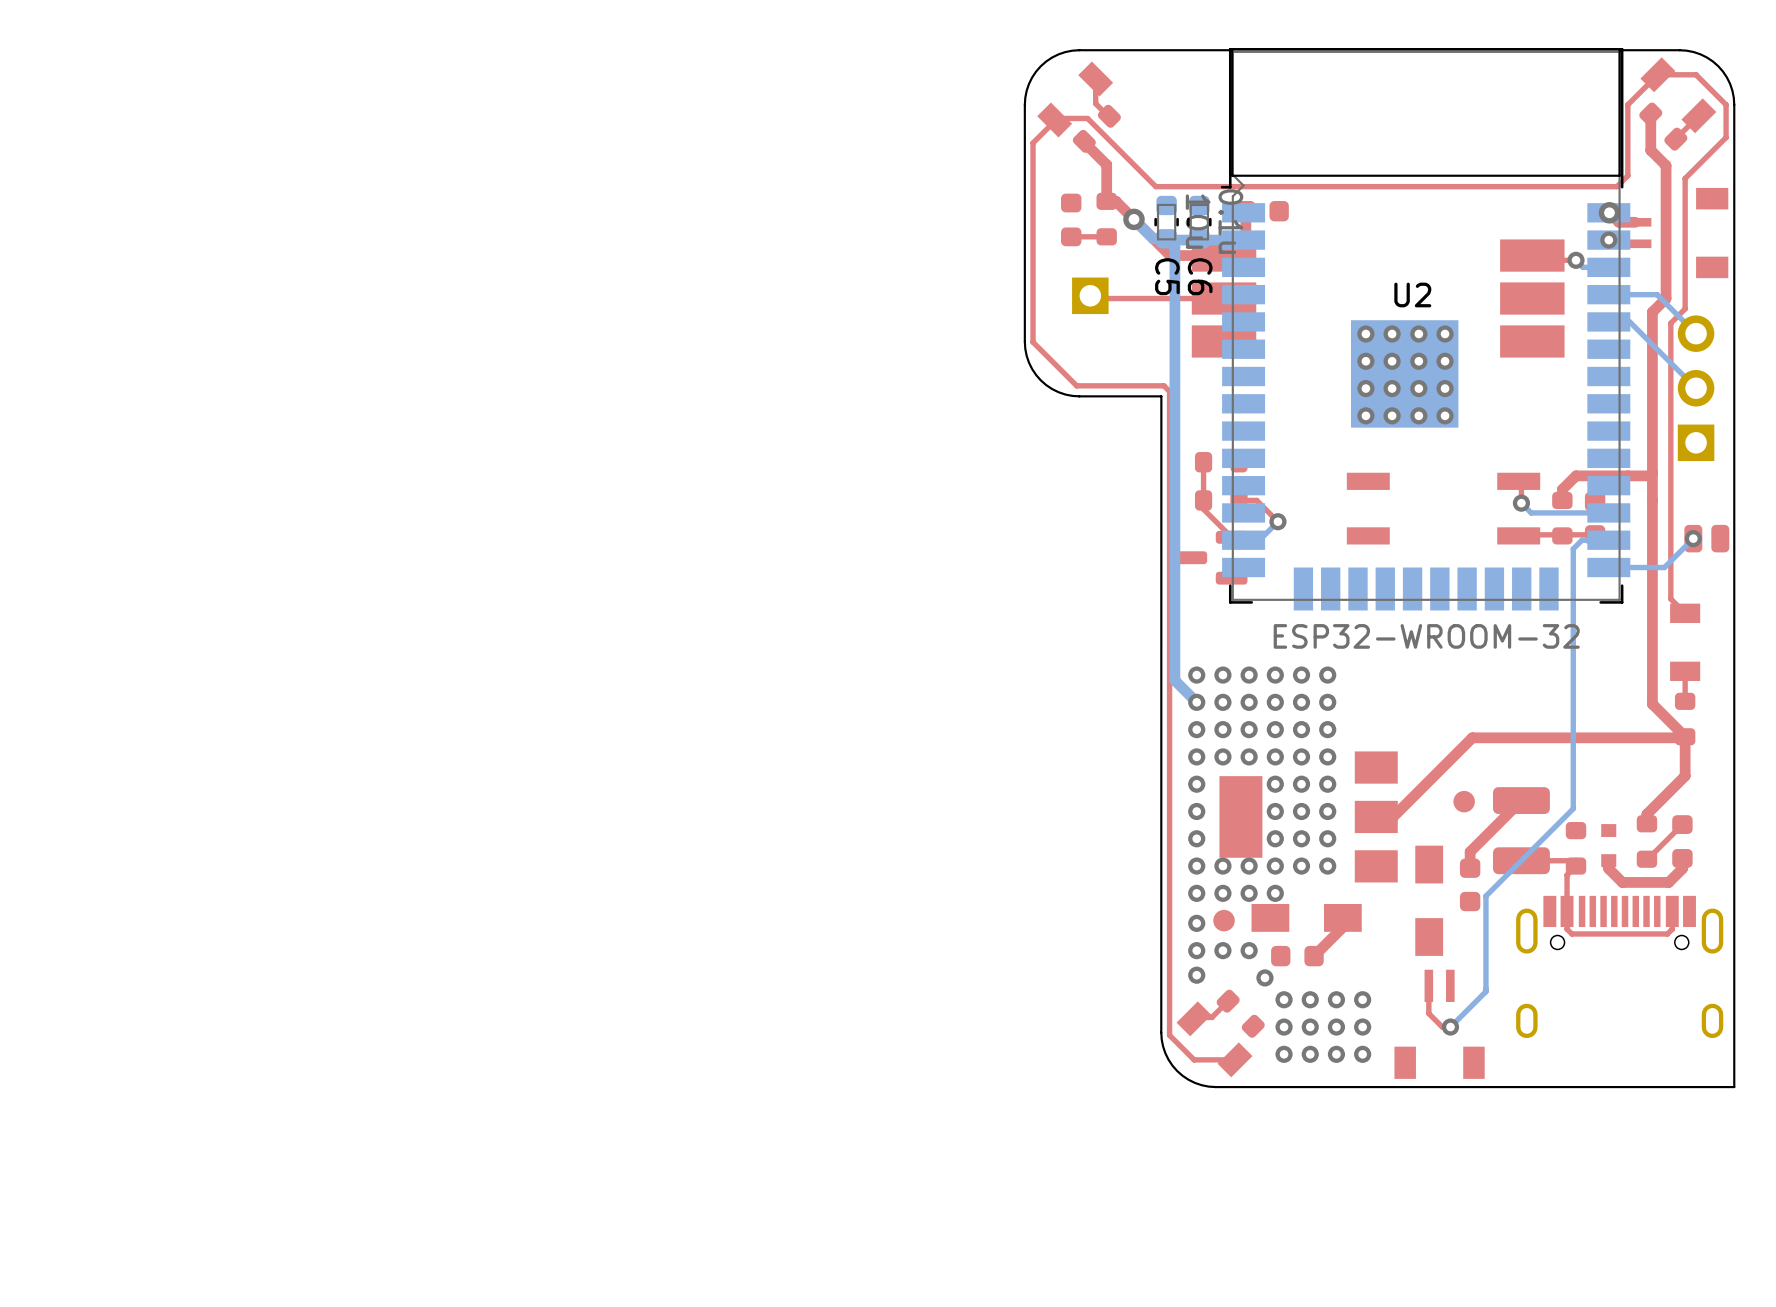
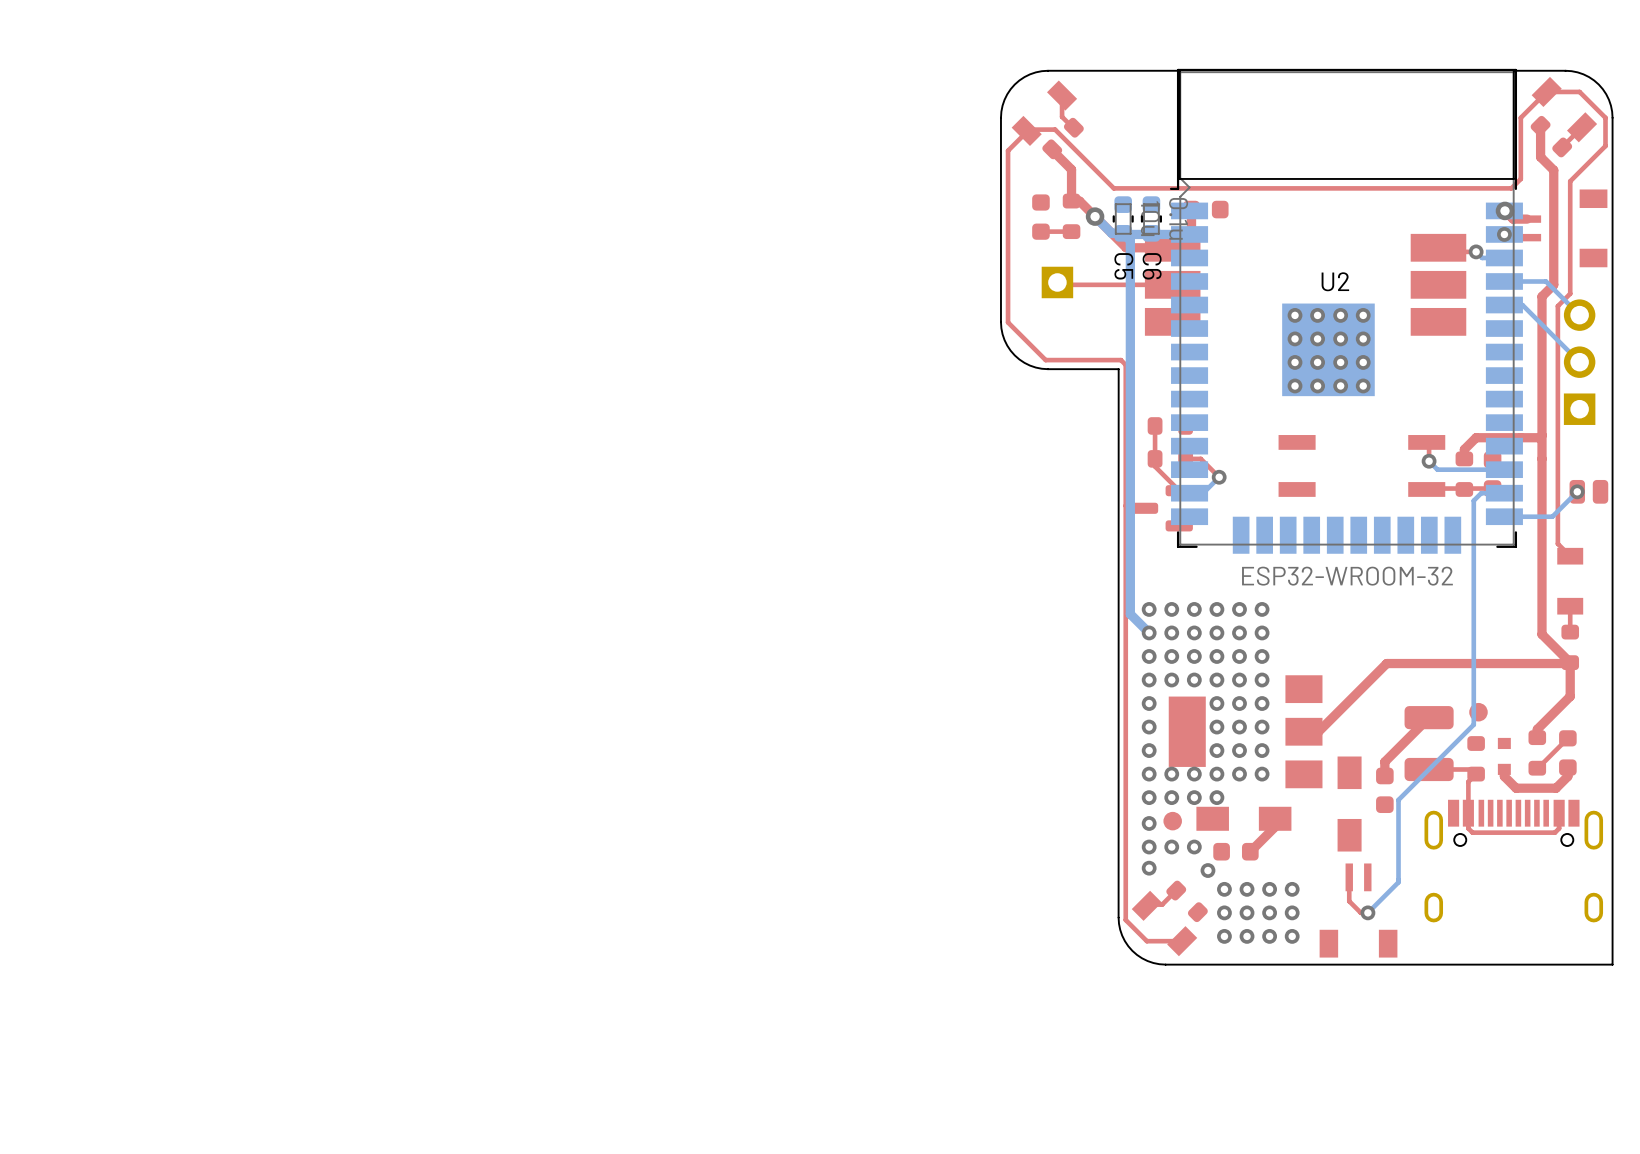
part position: (1464, 801) -> (1478, 712)

